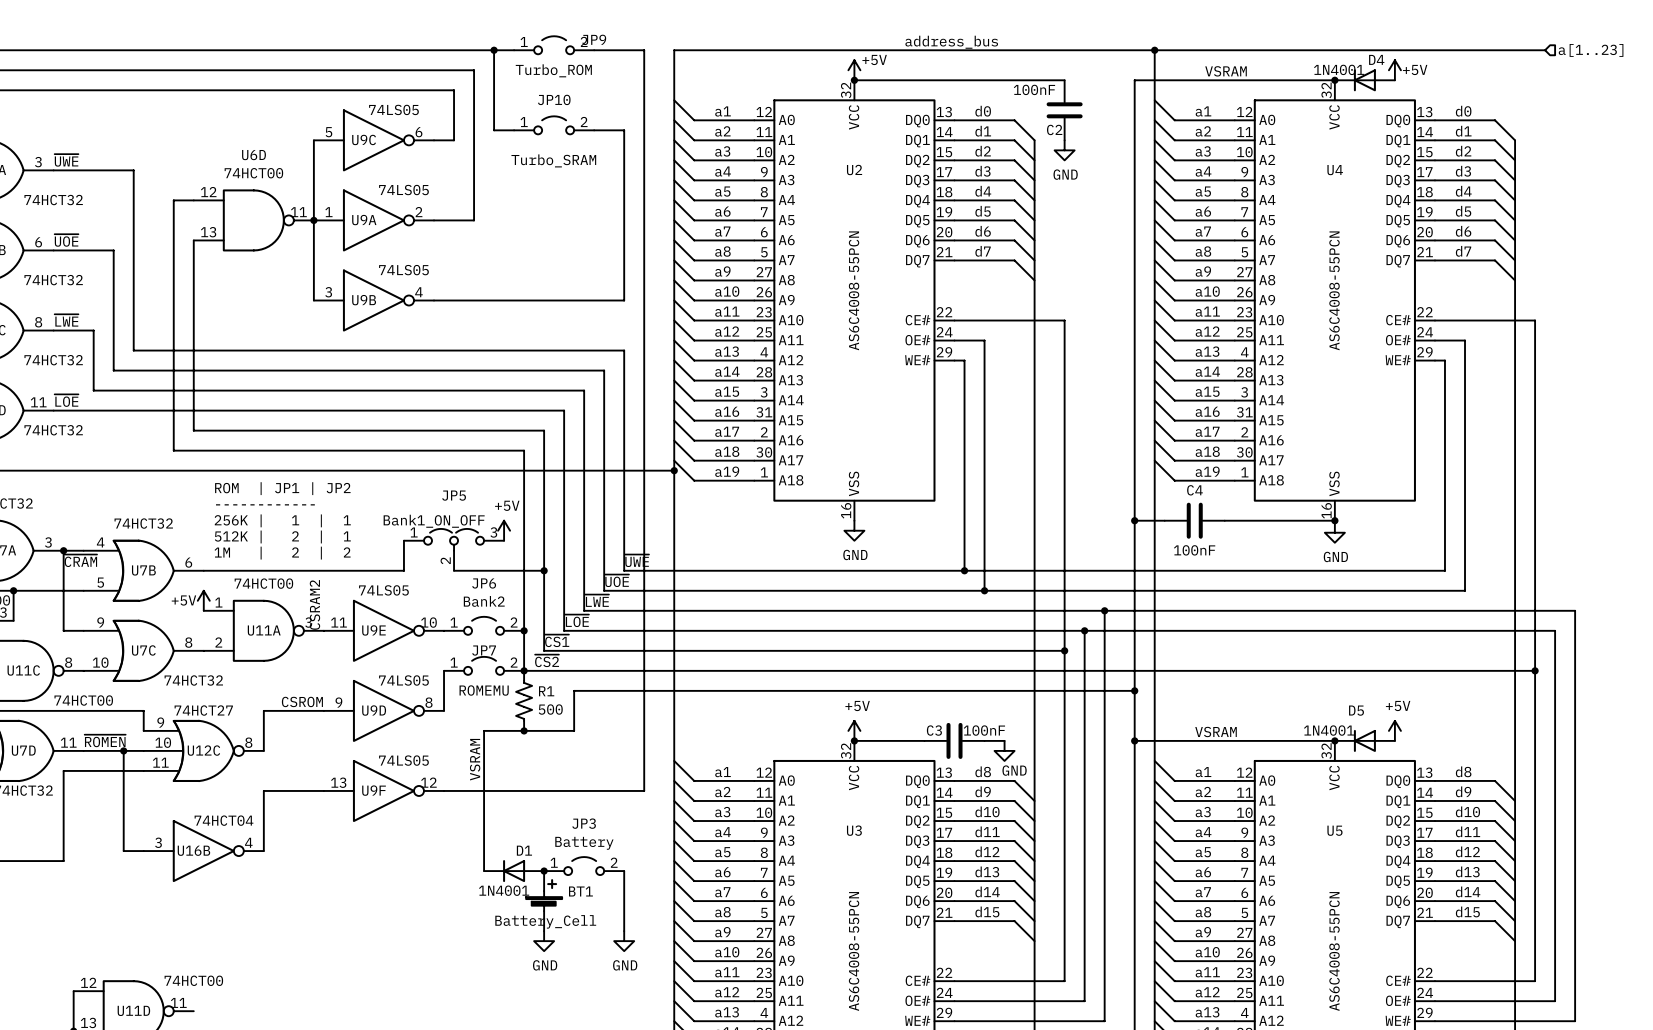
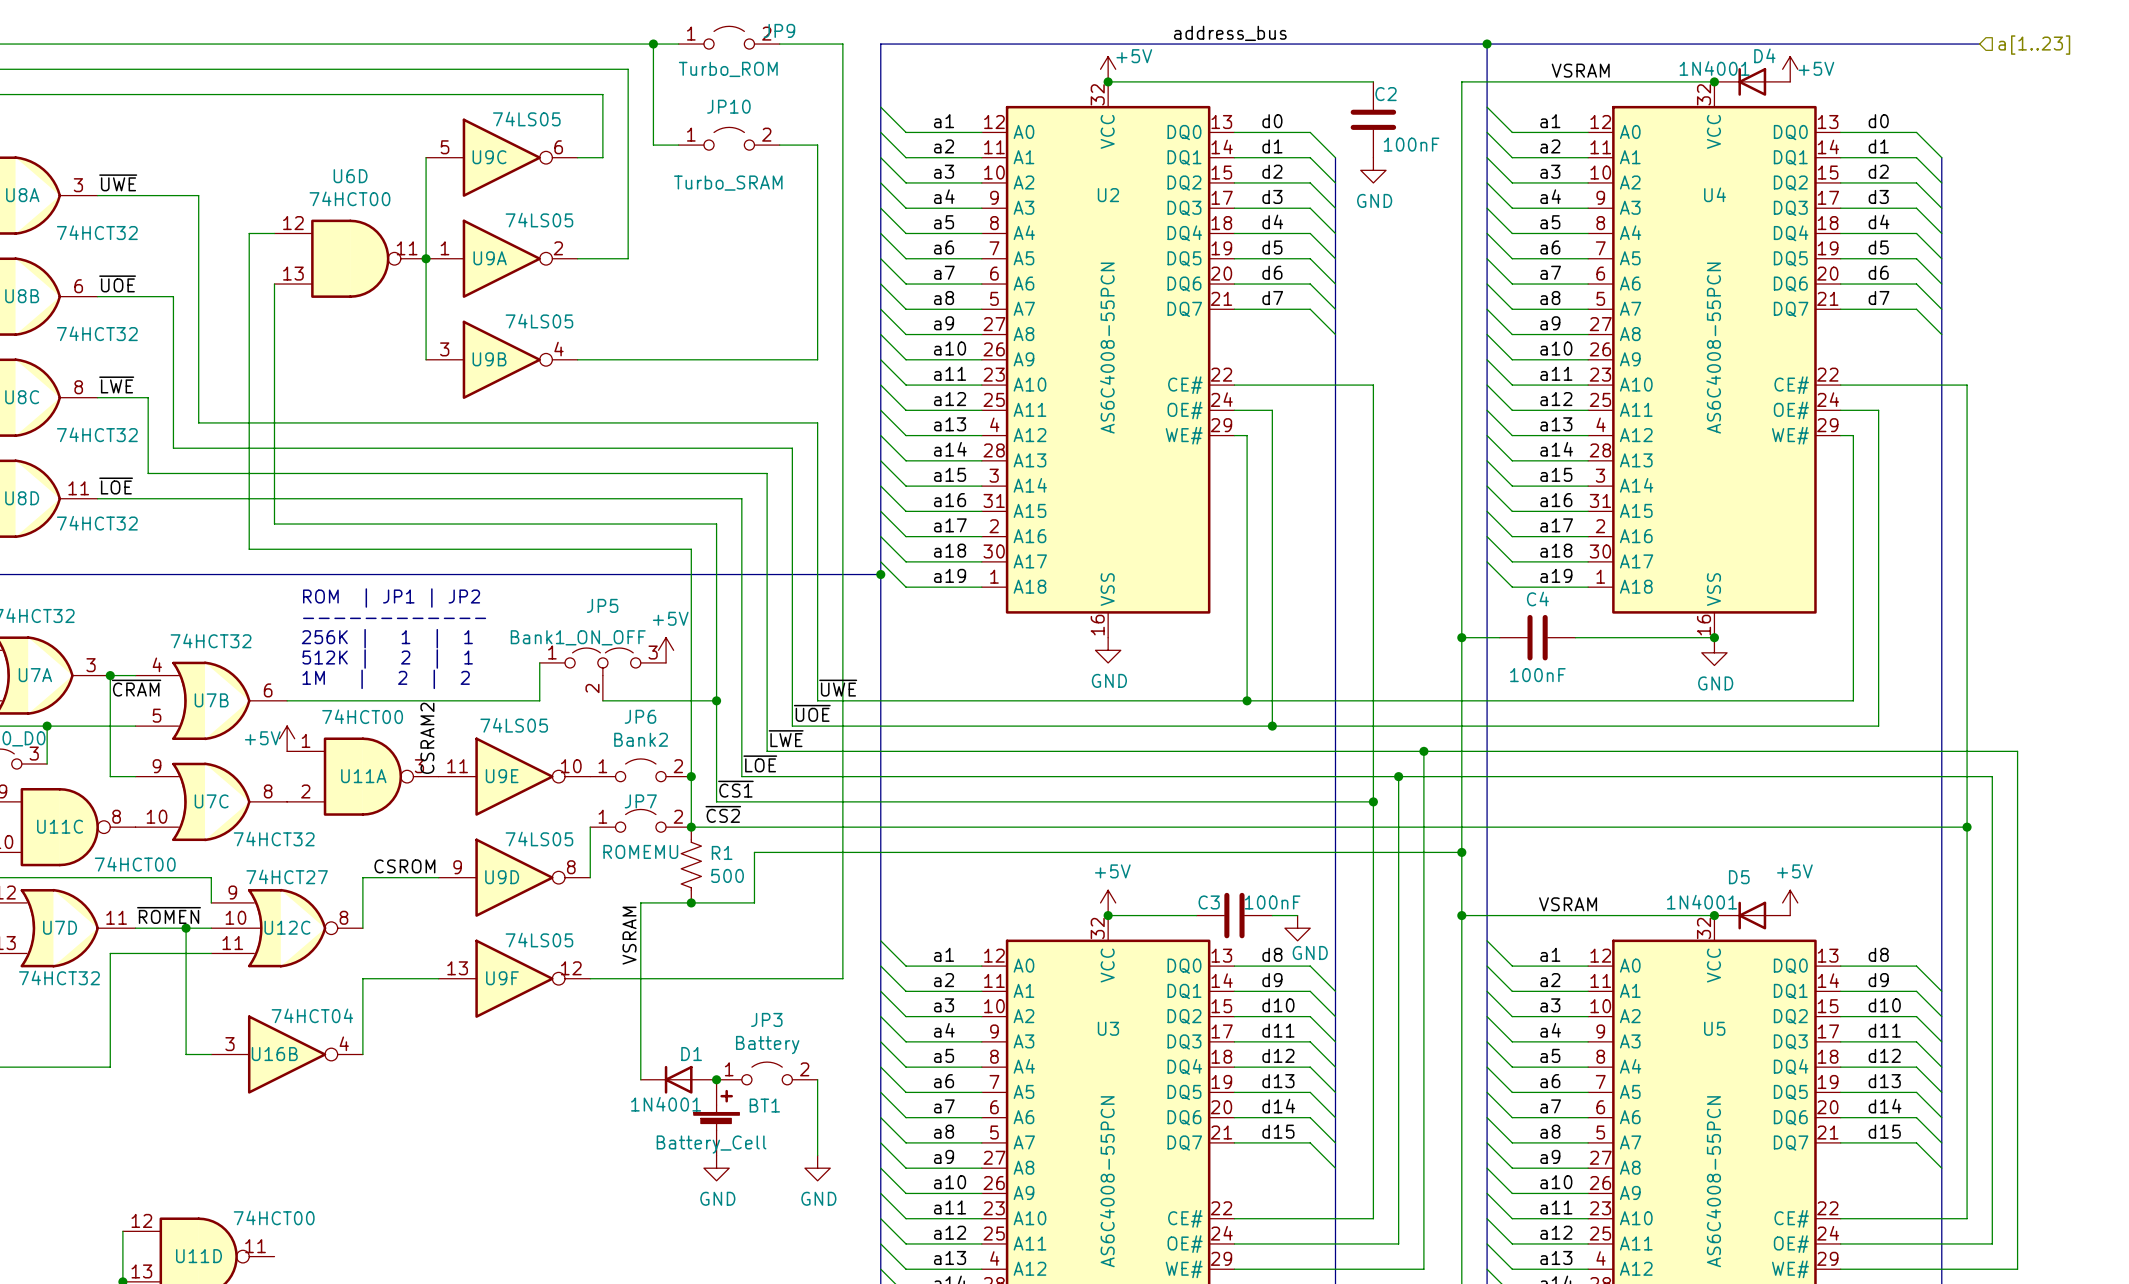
C2 value position: 100nF (1034, 89) -> 100nF (1411, 144)
C2 name position: C2 (1054, 129) -> C2 (1386, 94)

